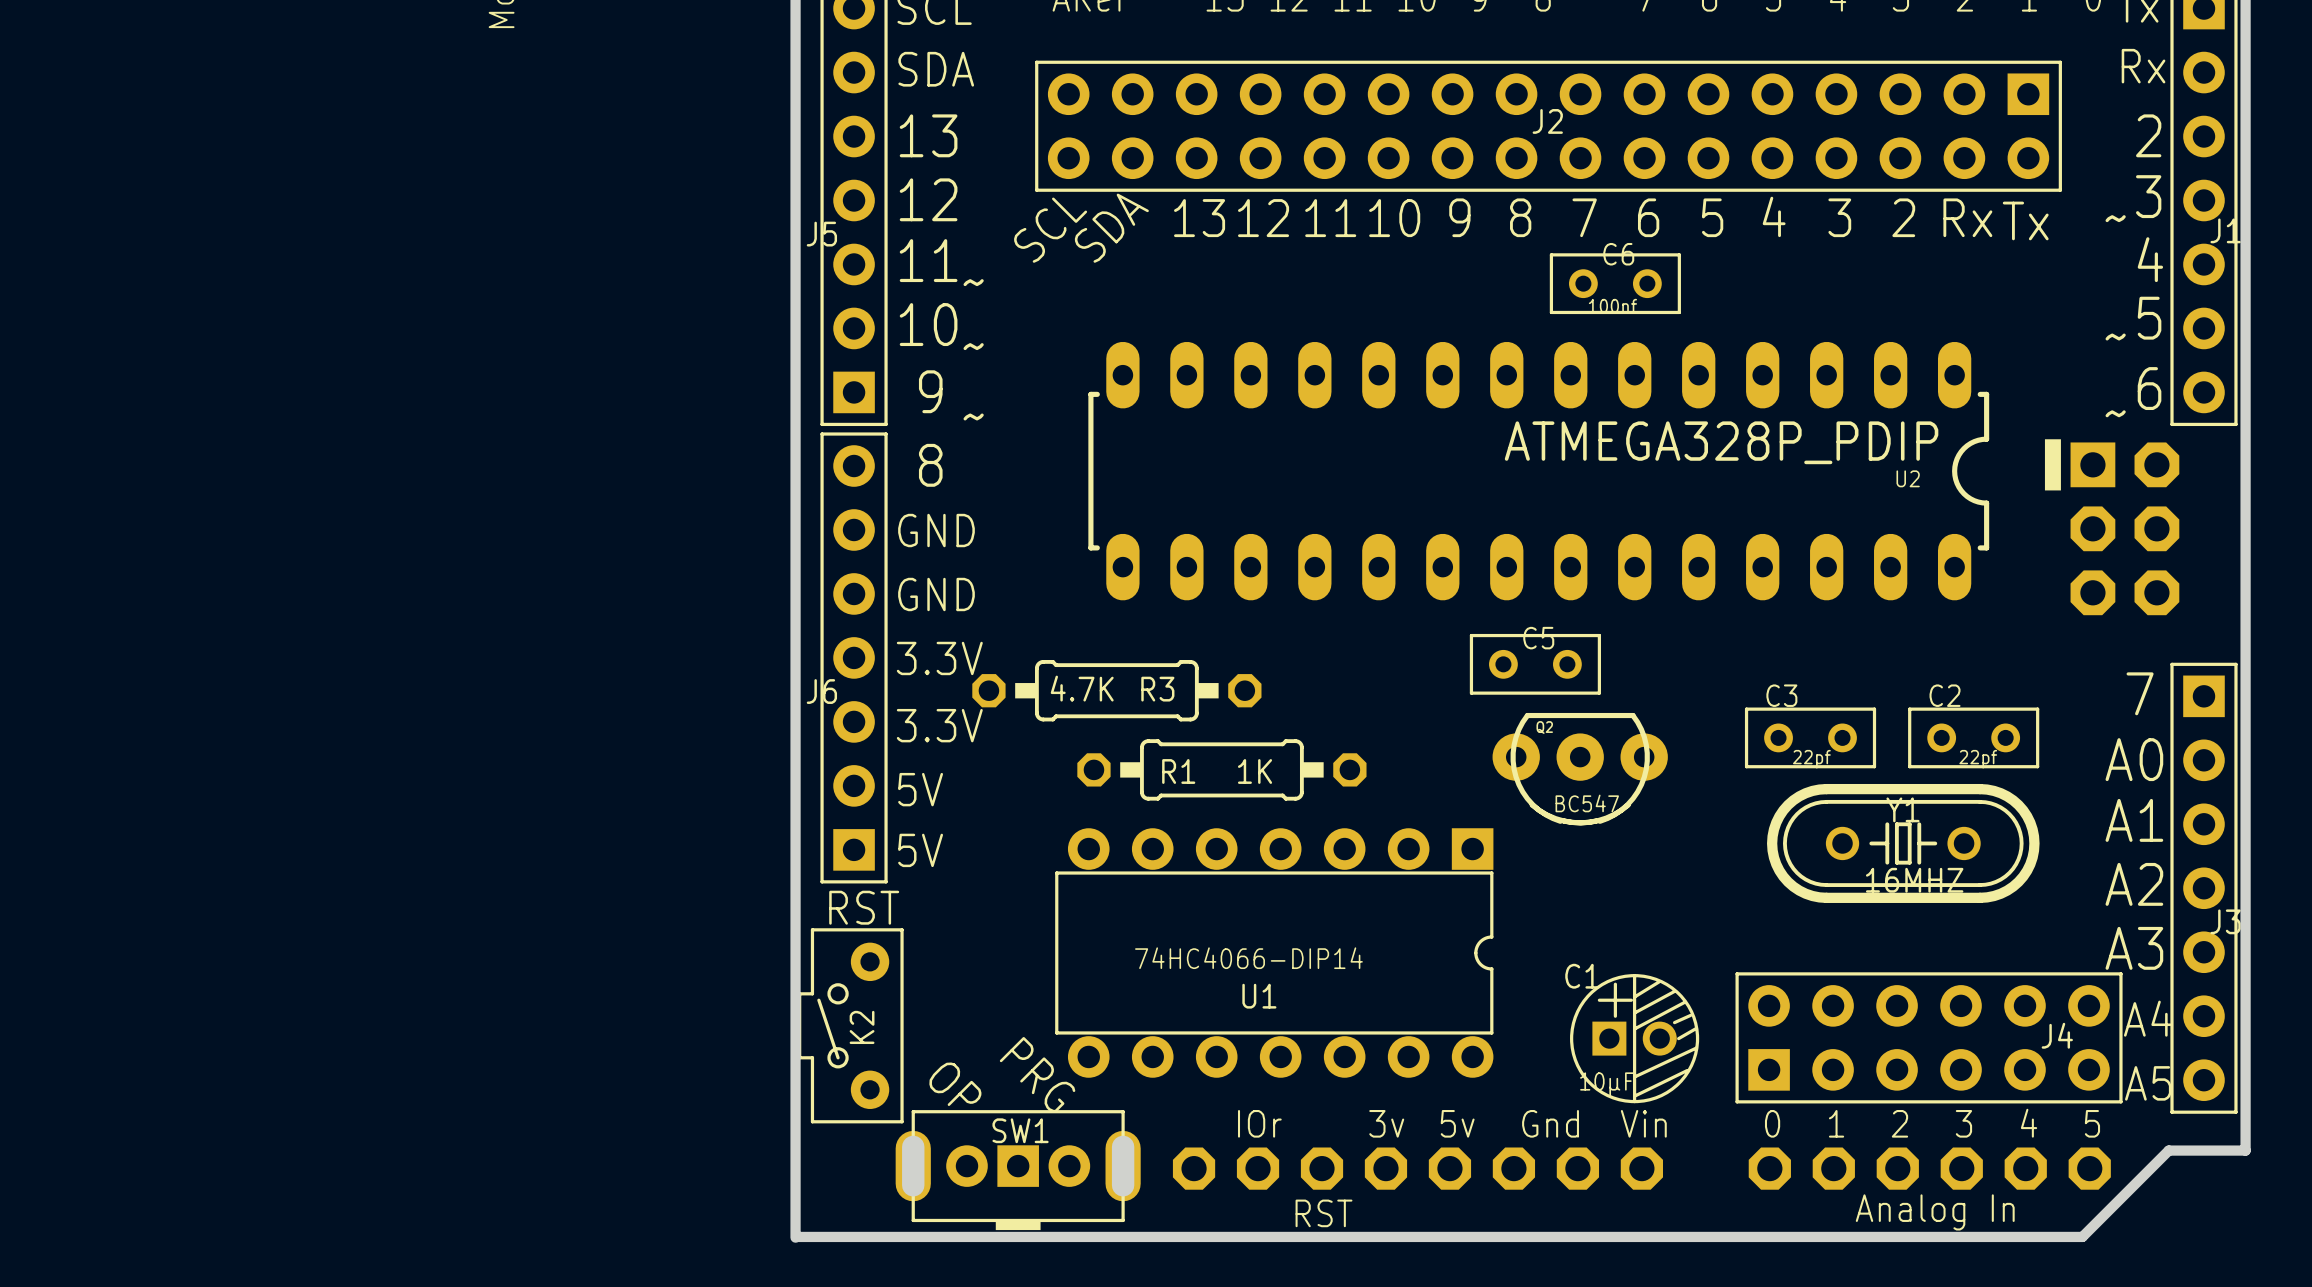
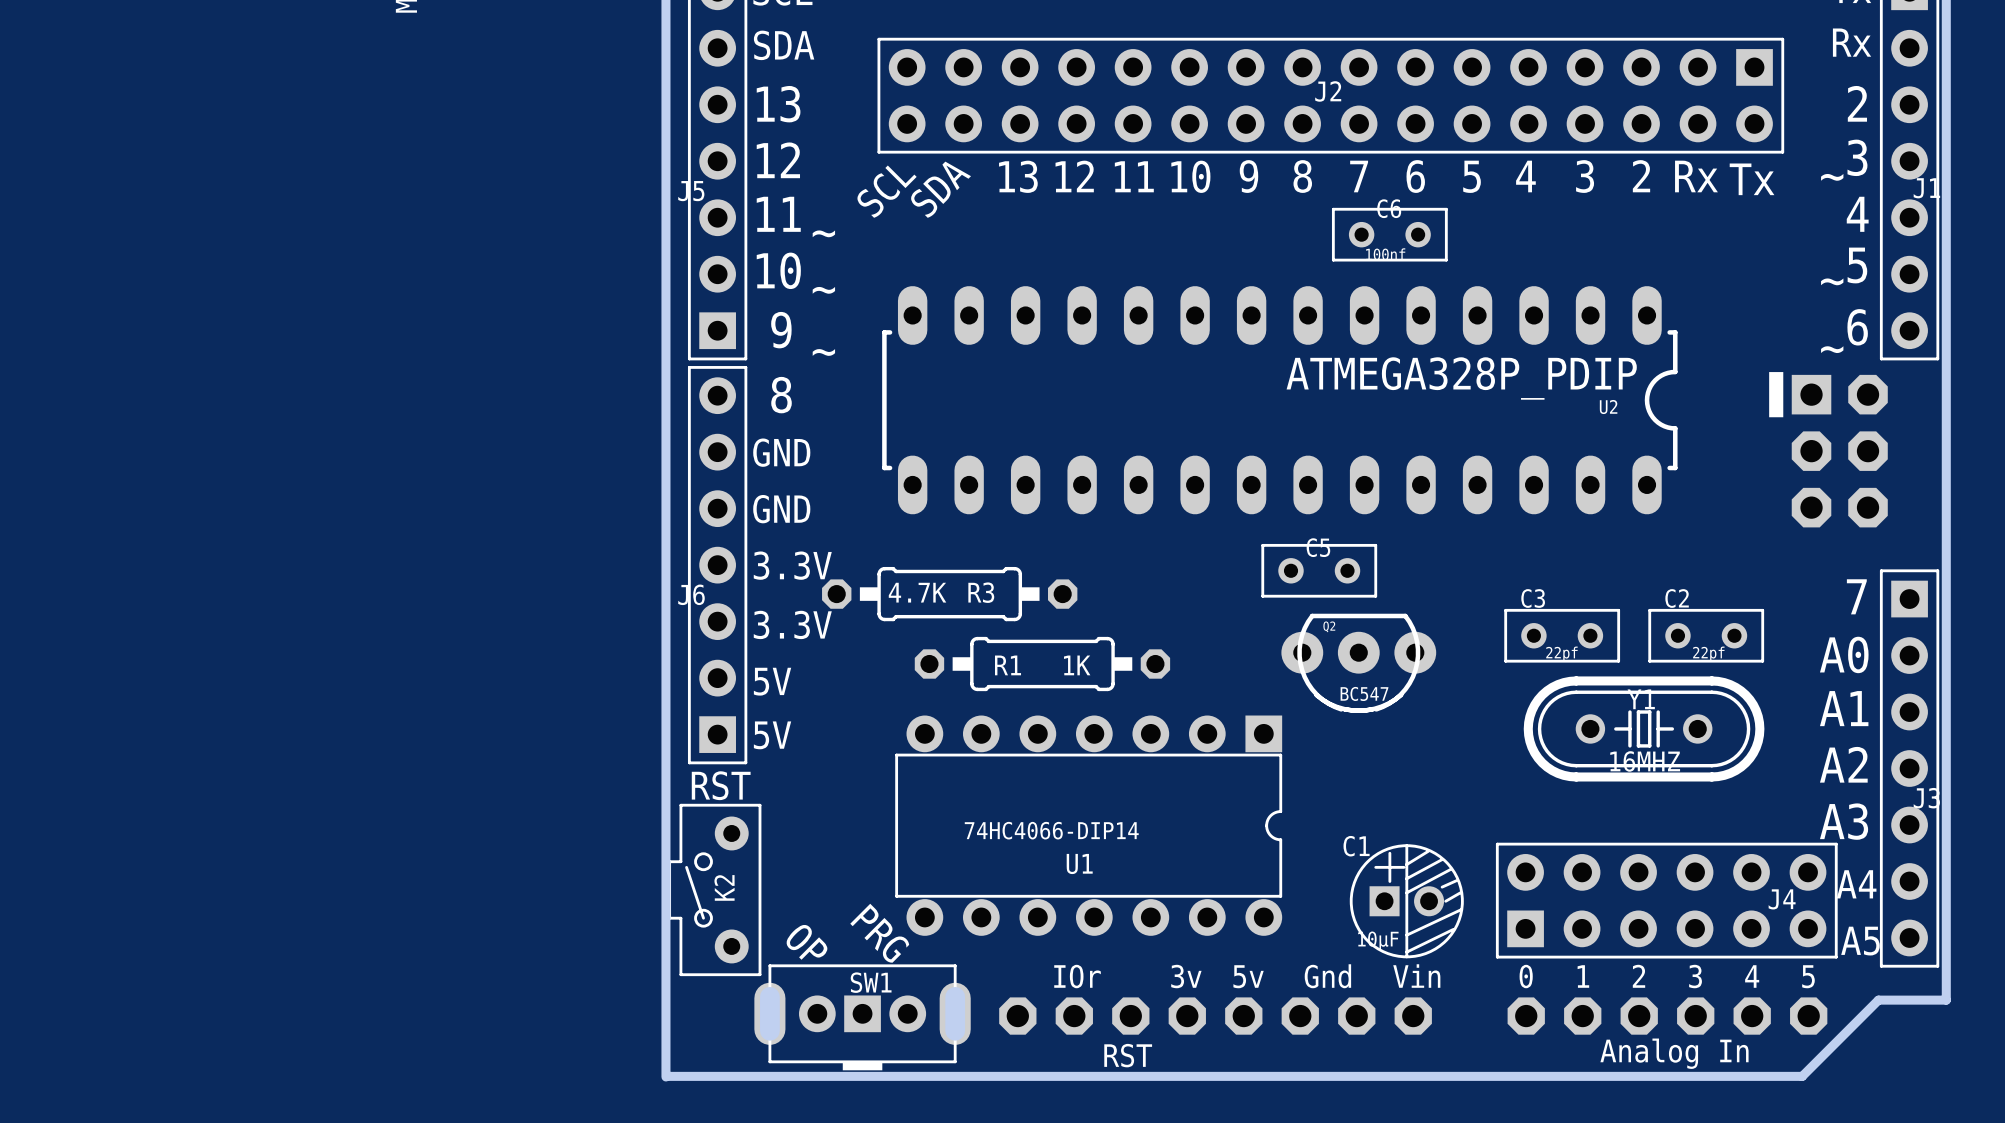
U2 position: (1538, 471) -> (1279, 400)

